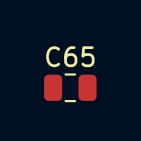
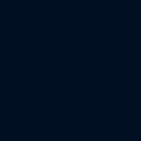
C65: (70, 87) -> none

